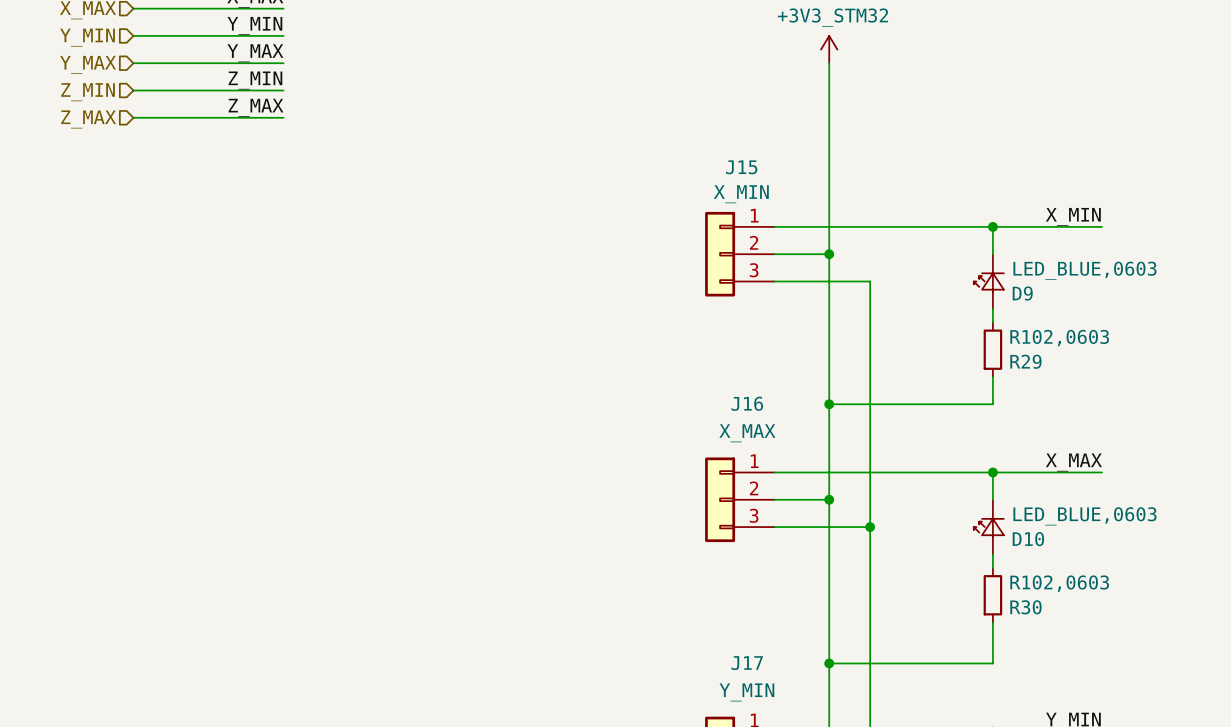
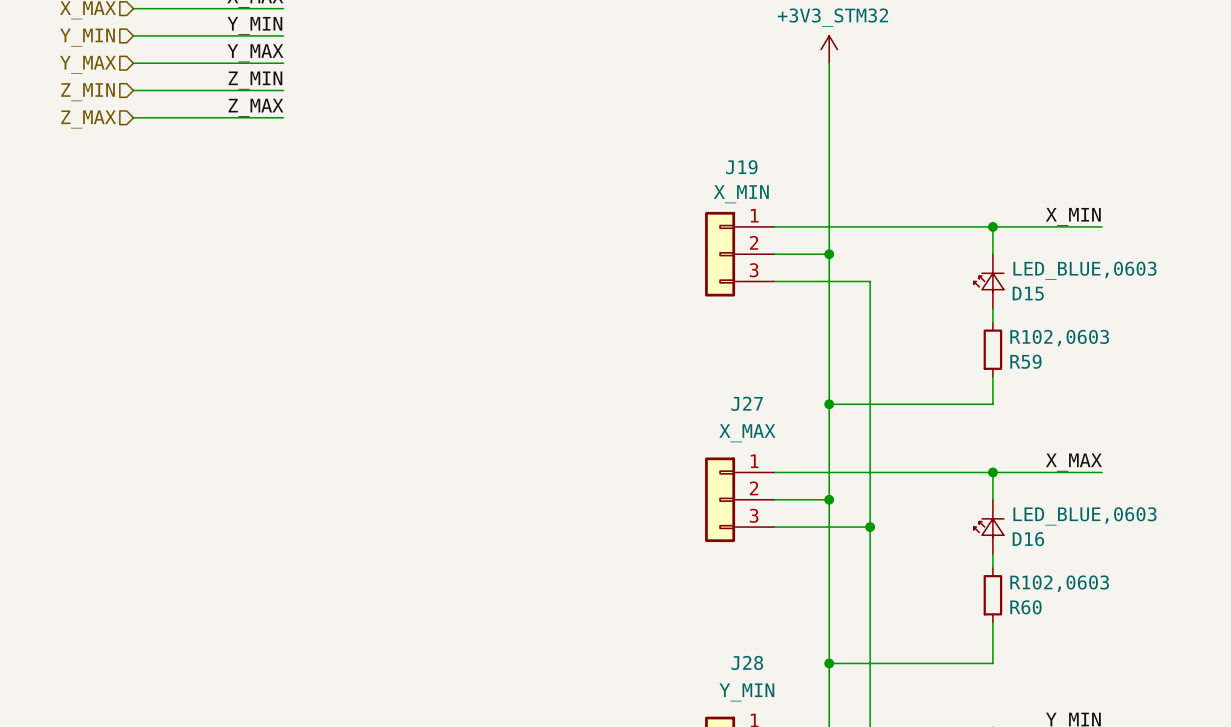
J15 name: J15 (741, 167) -> J19 (741, 167)
D9 name: D9 (1022, 293) -> D15 (1028, 293)
R29 name: R29 (1025, 361) -> R59 (1025, 361)
J16 name: J16 (747, 403) -> J27 (747, 403)
D10 name: D10 (1028, 539) -> D16 (1028, 539)
R30 name: R30 (1025, 607) -> R60 (1025, 607)
J17 name: J17 (747, 663) -> J28 (747, 662)

